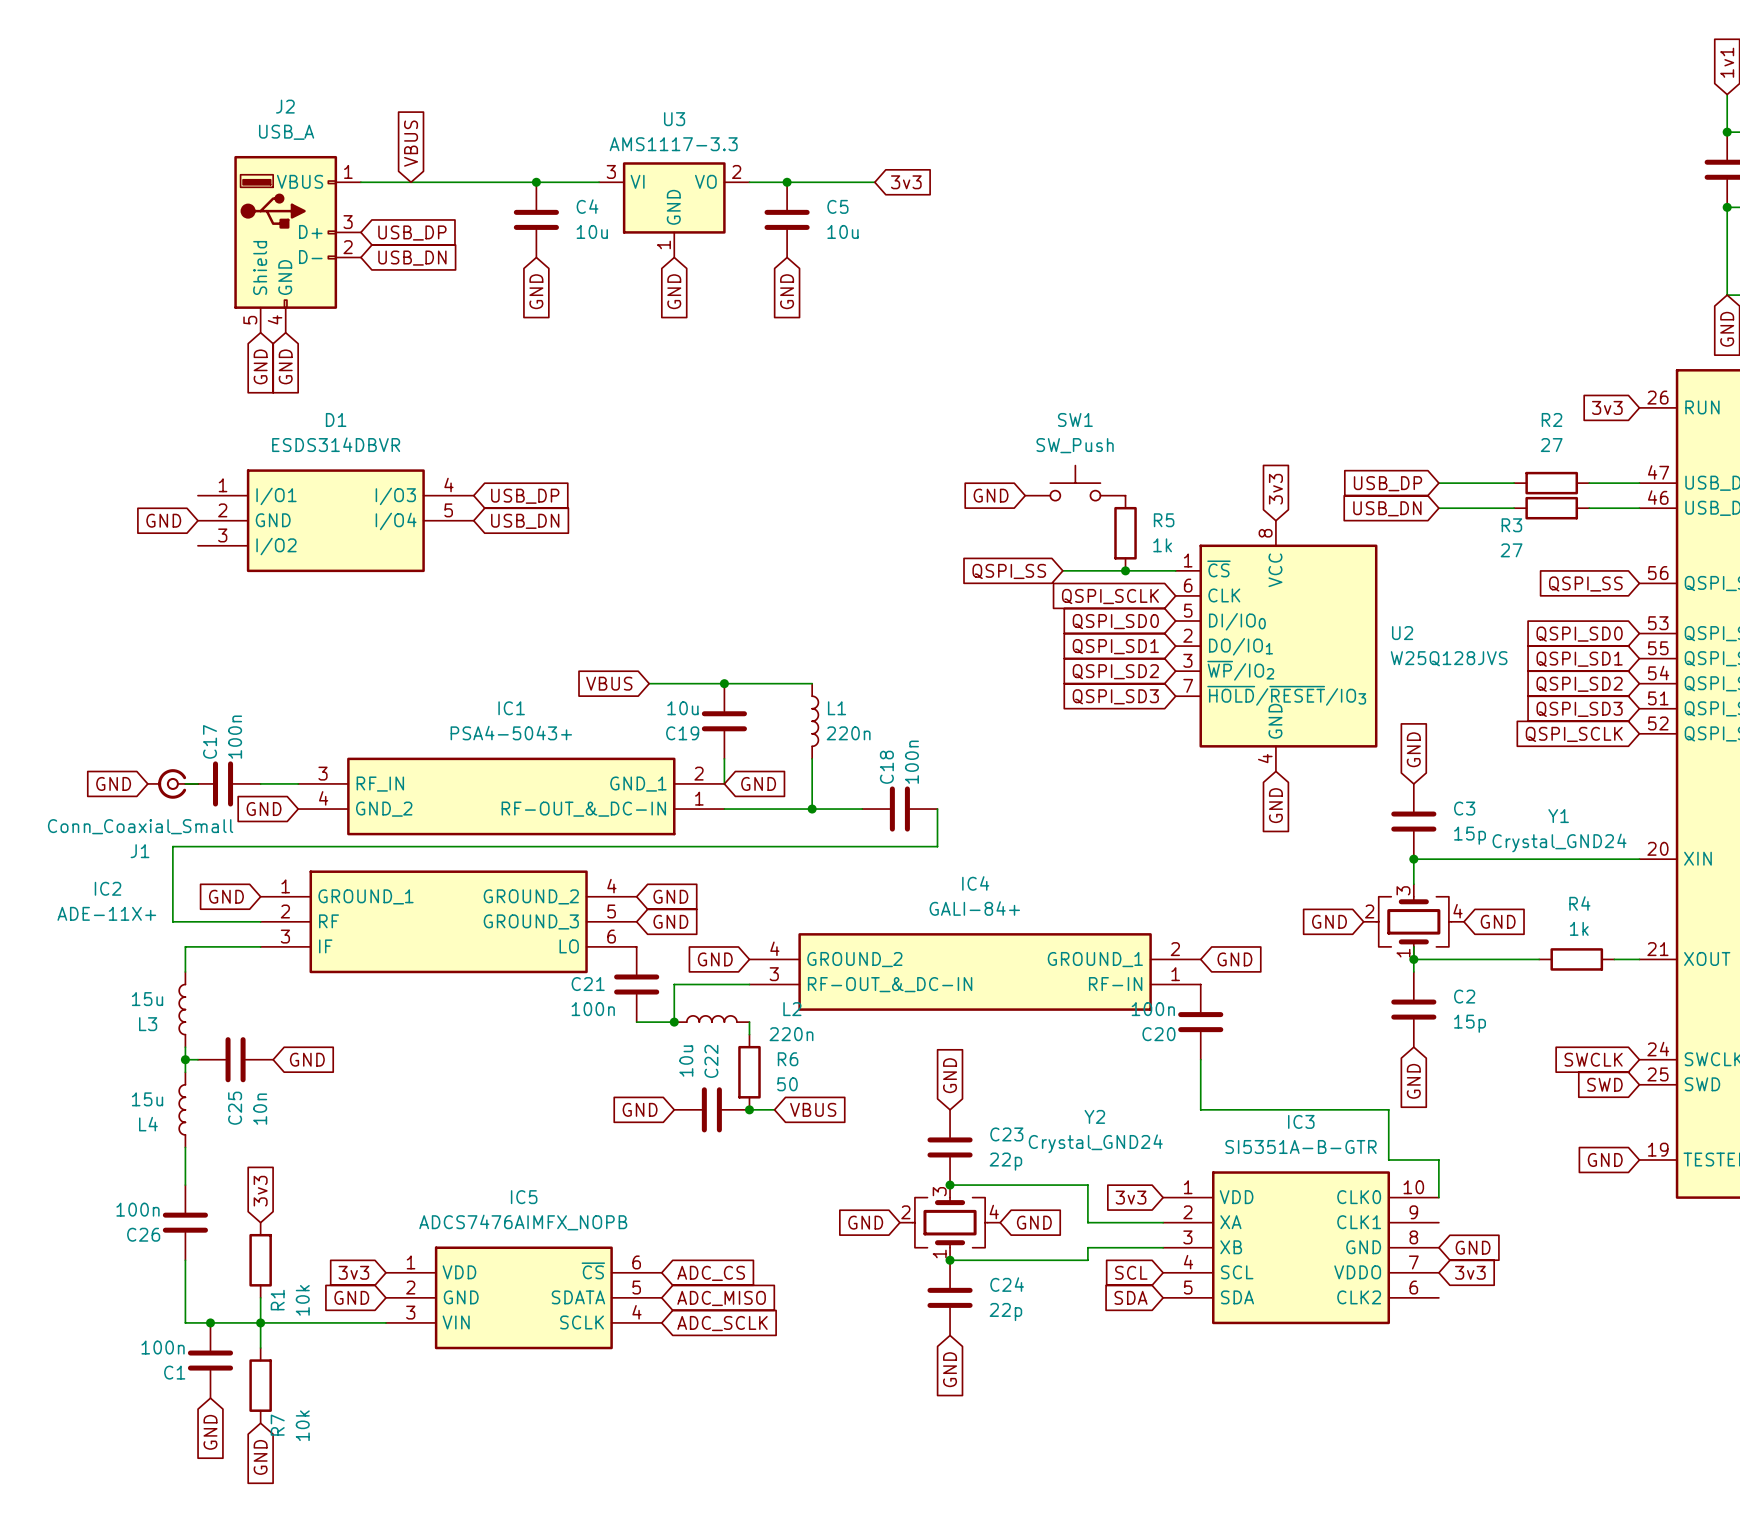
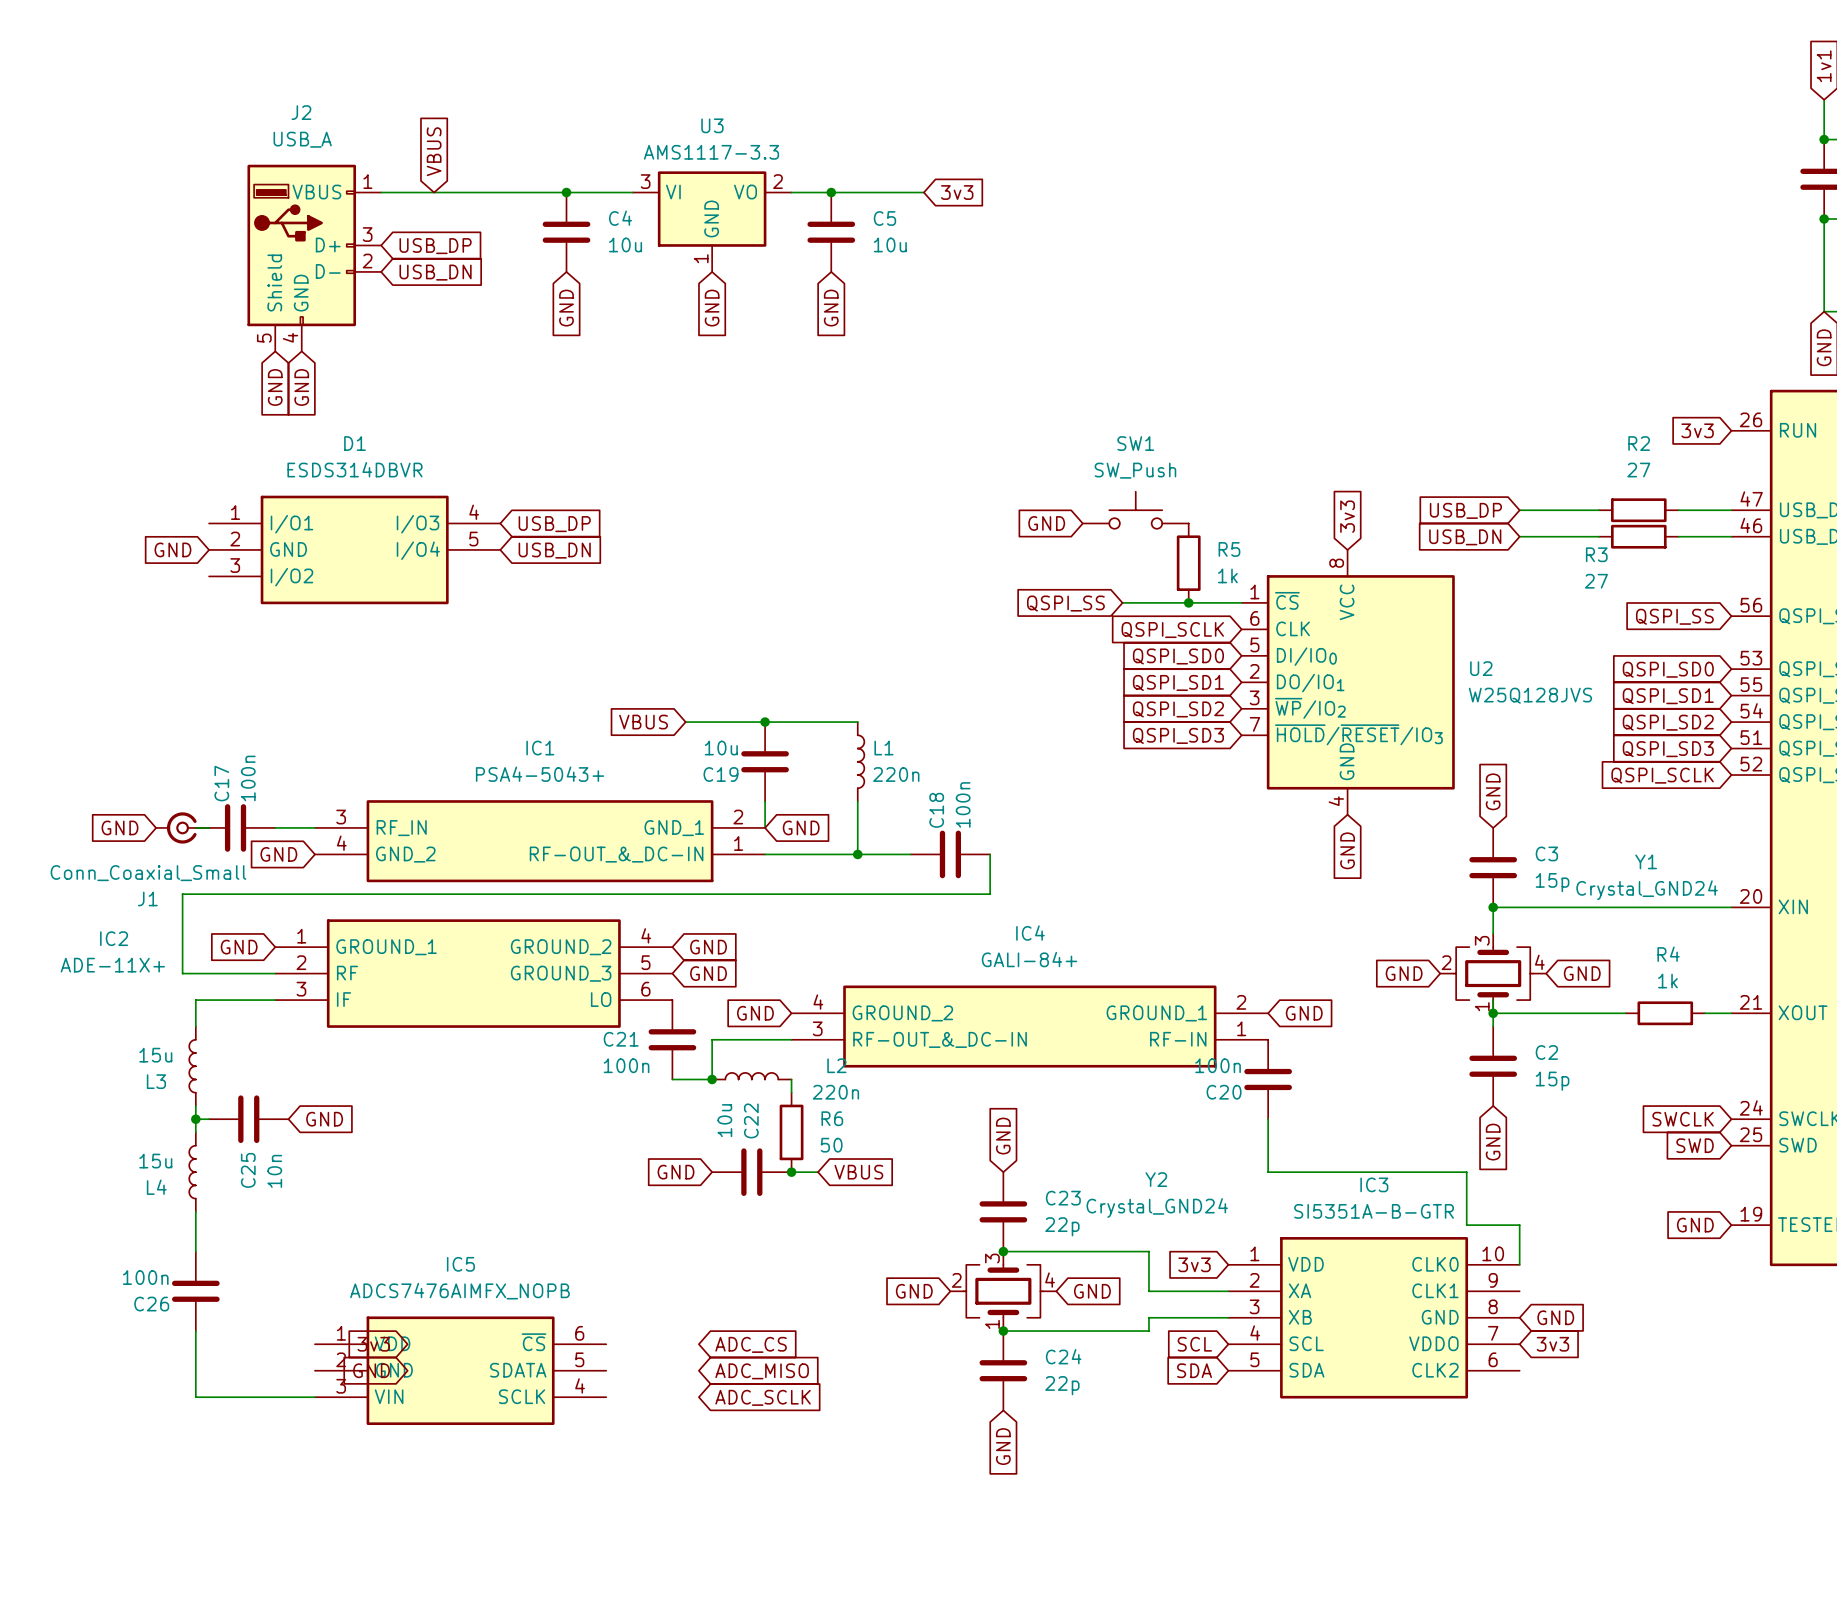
global label: 3v3 (260, 1191) -> none
R1: 10k (260, 1260) -> none
wire: (260, 1297) (260, 1348) -> none
IC5 position: (523, 1297) -> (460, 1370)
junction: (210, 1322) -> none
junction: (260, 1322) -> none
C1: 100n (210, 1360) -> none
R7: 10k (260, 1385) -> none
global label: GND (210, 1432) -> none
global label: GND (260, 1457) -> none

